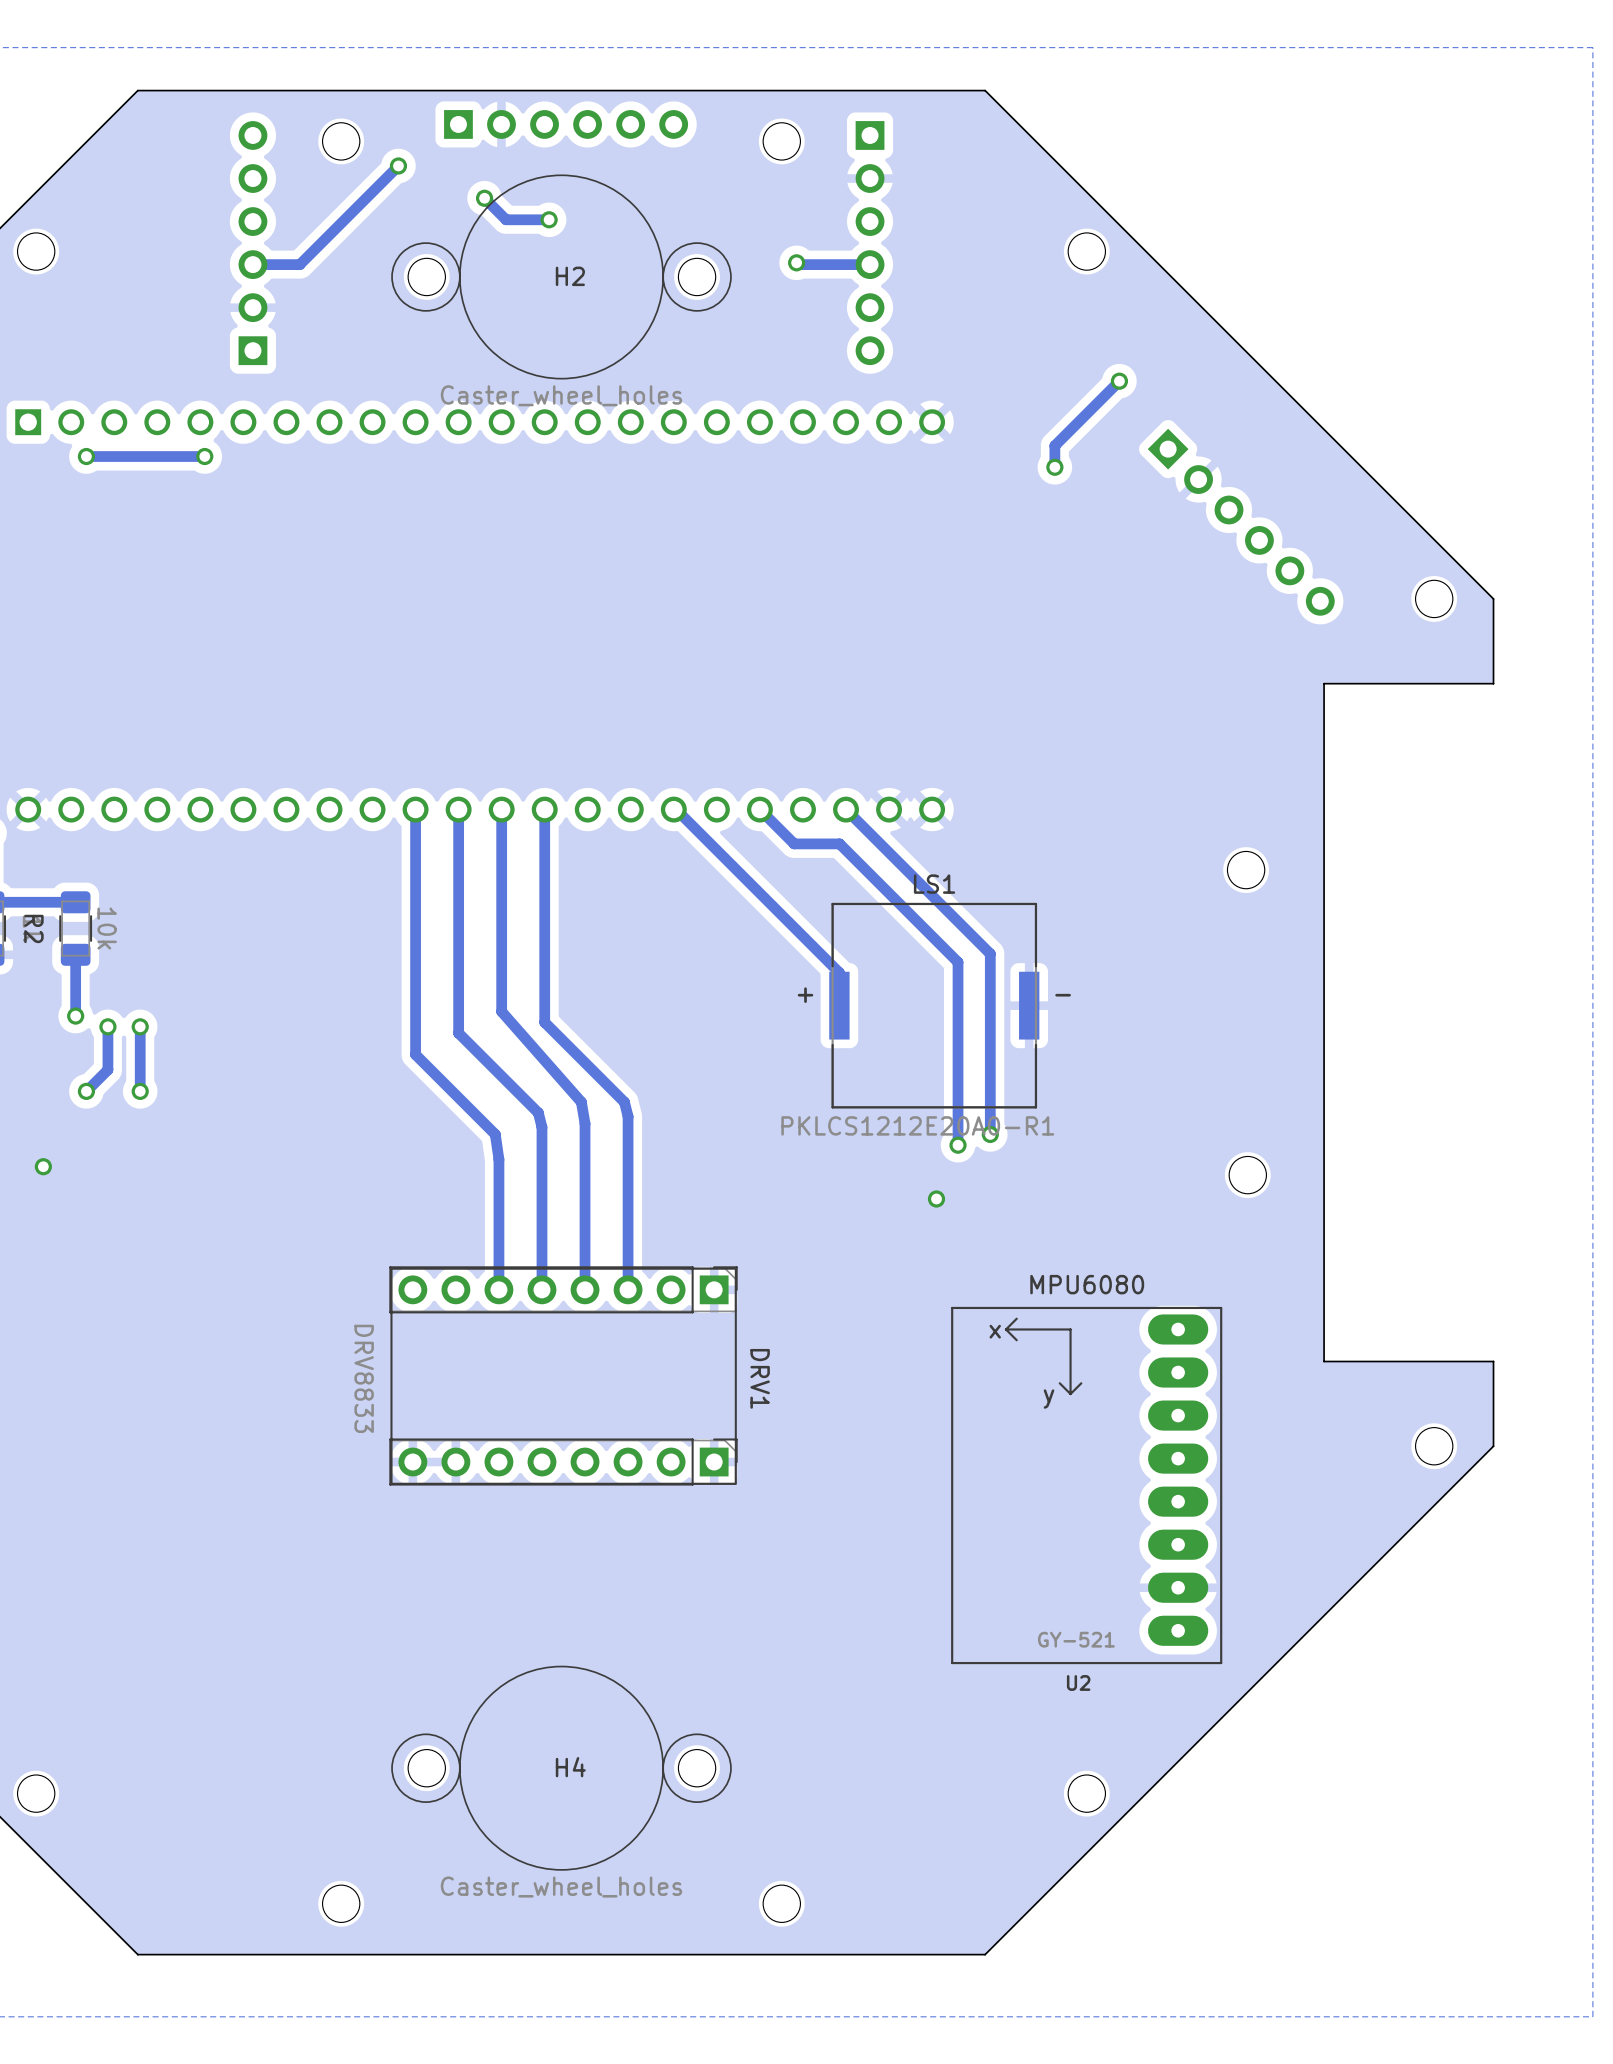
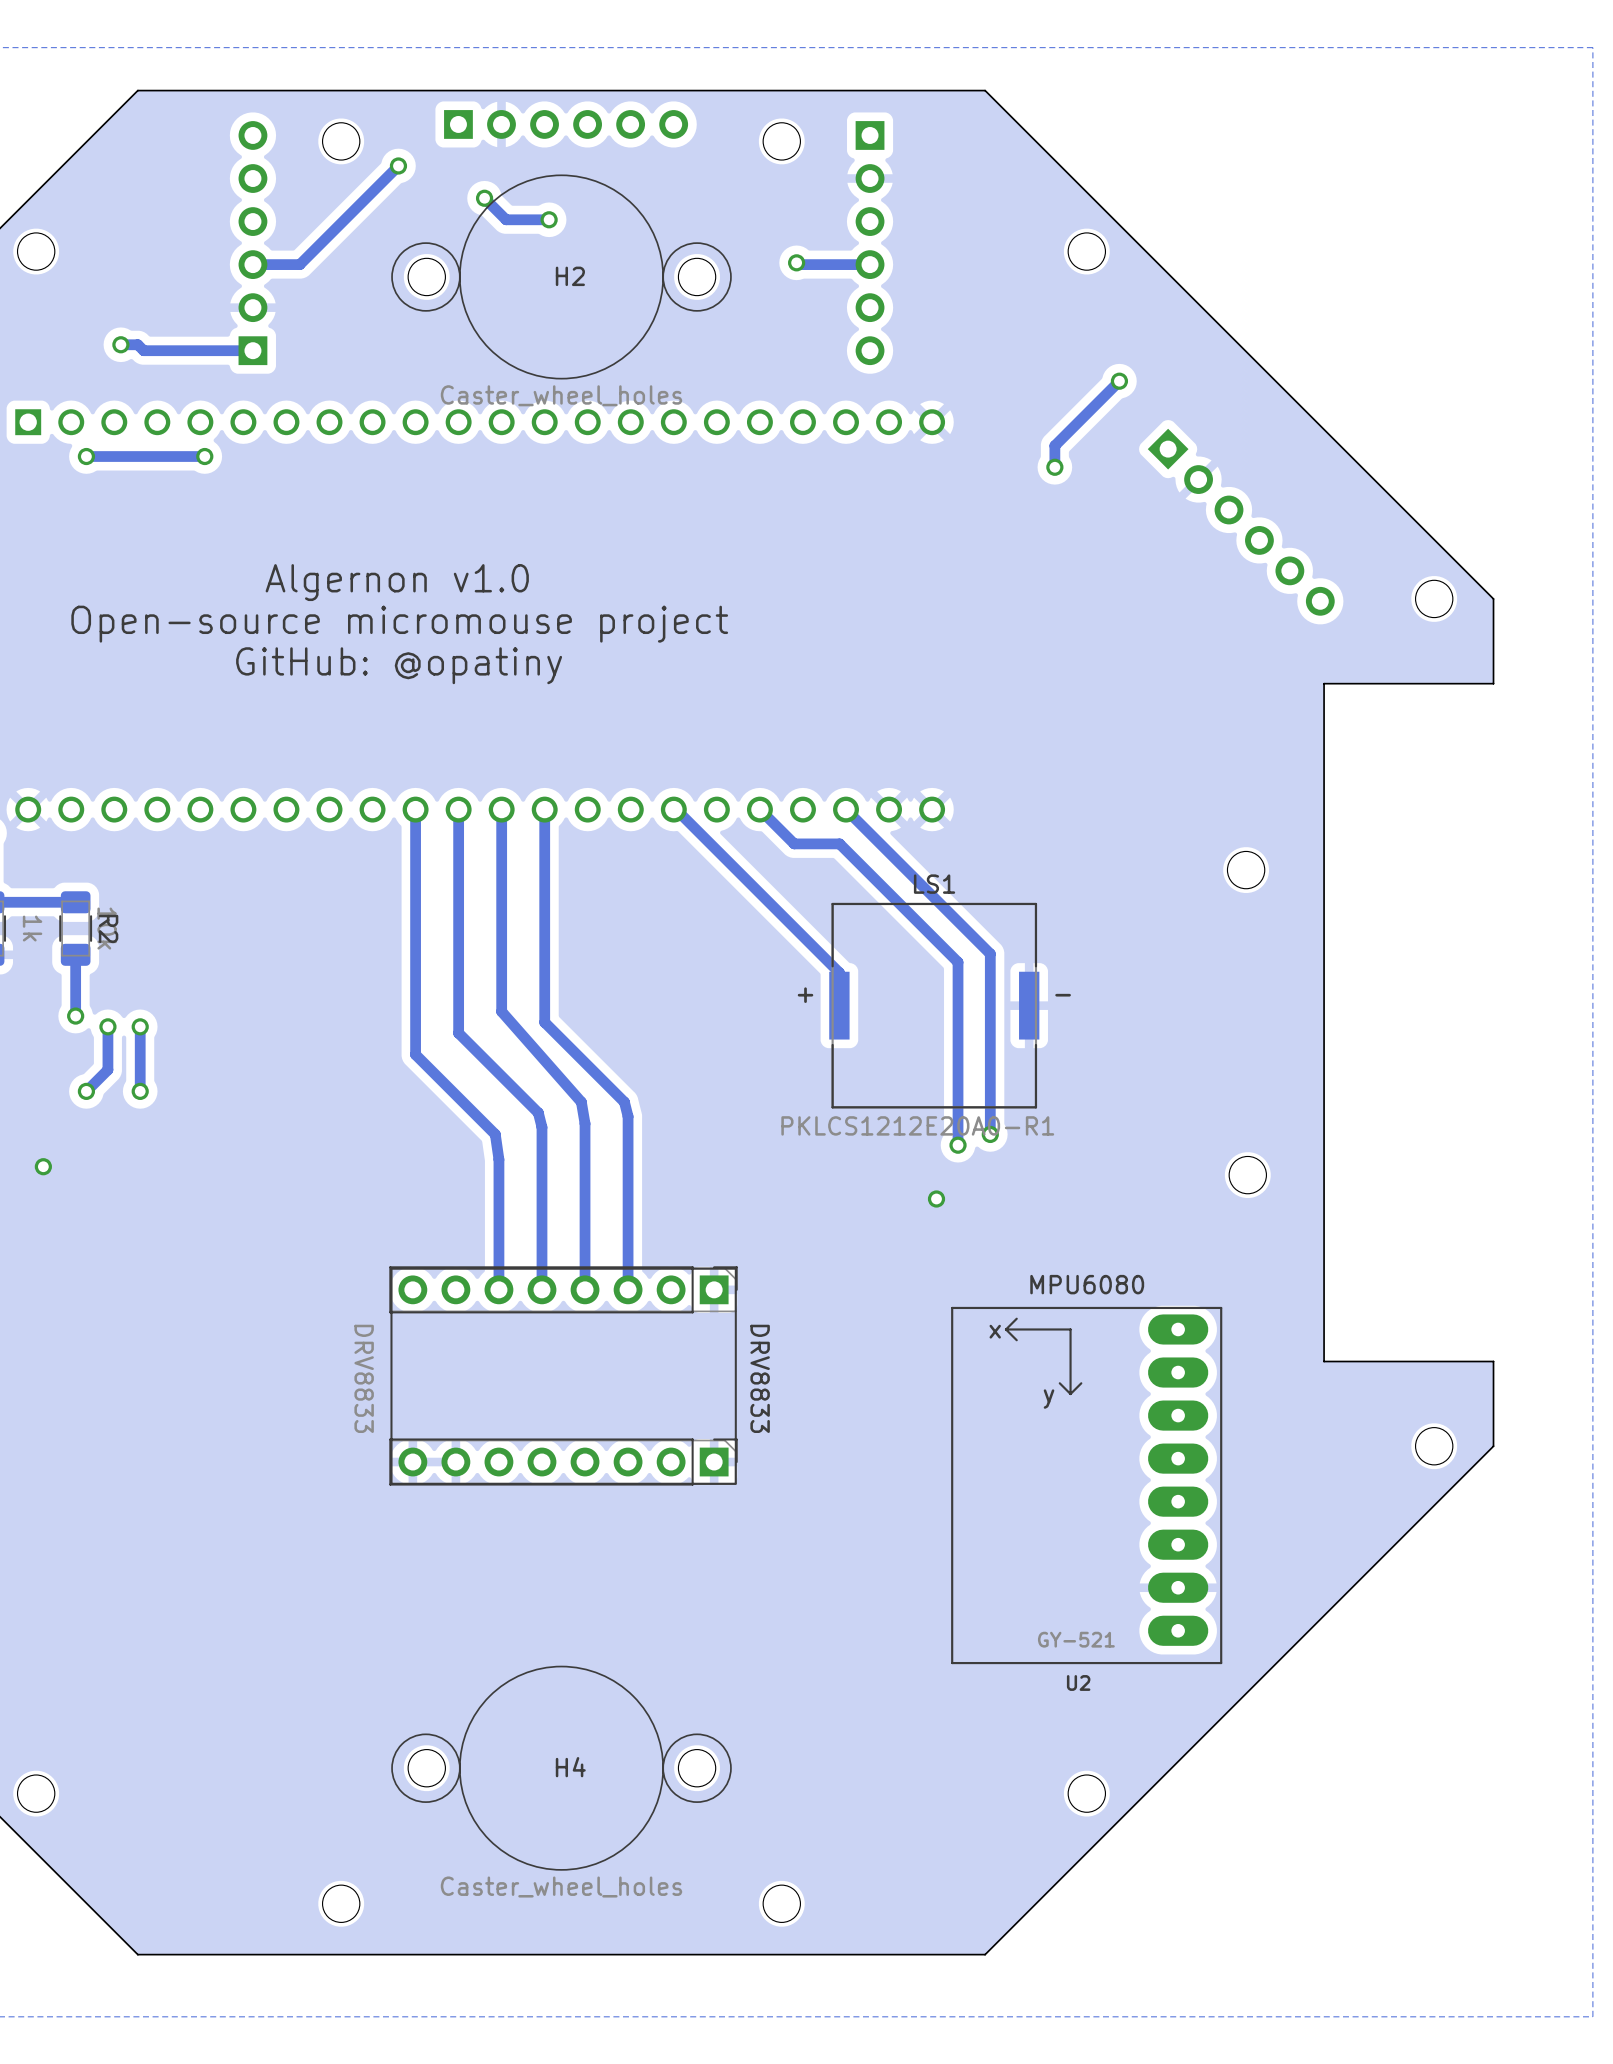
track: none -> (120, 344) (137, 344) (143, 350) (252, 350)
via: none -> (120, 344)
text: none -> Algernon v1.0 (397, 582)
text: none -> Open-source micromouse project (399, 624)
text: none -> GitHub: @opatiny (399, 665)
R2 name position: R2 (33, 928) -> R2 (108, 928)
DRV1 name: DRV1 (760, 1378) -> DRV8833 (760, 1378)

